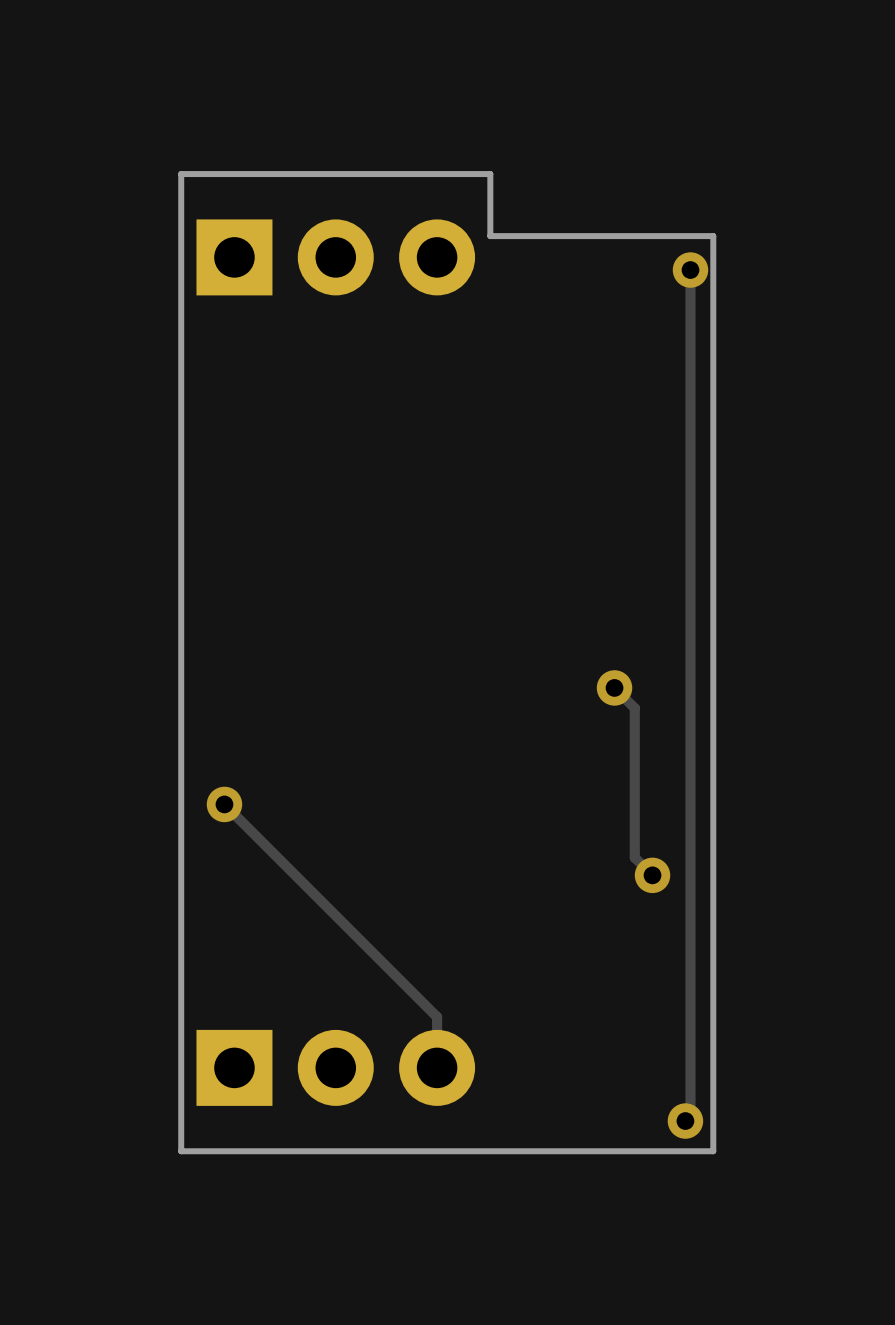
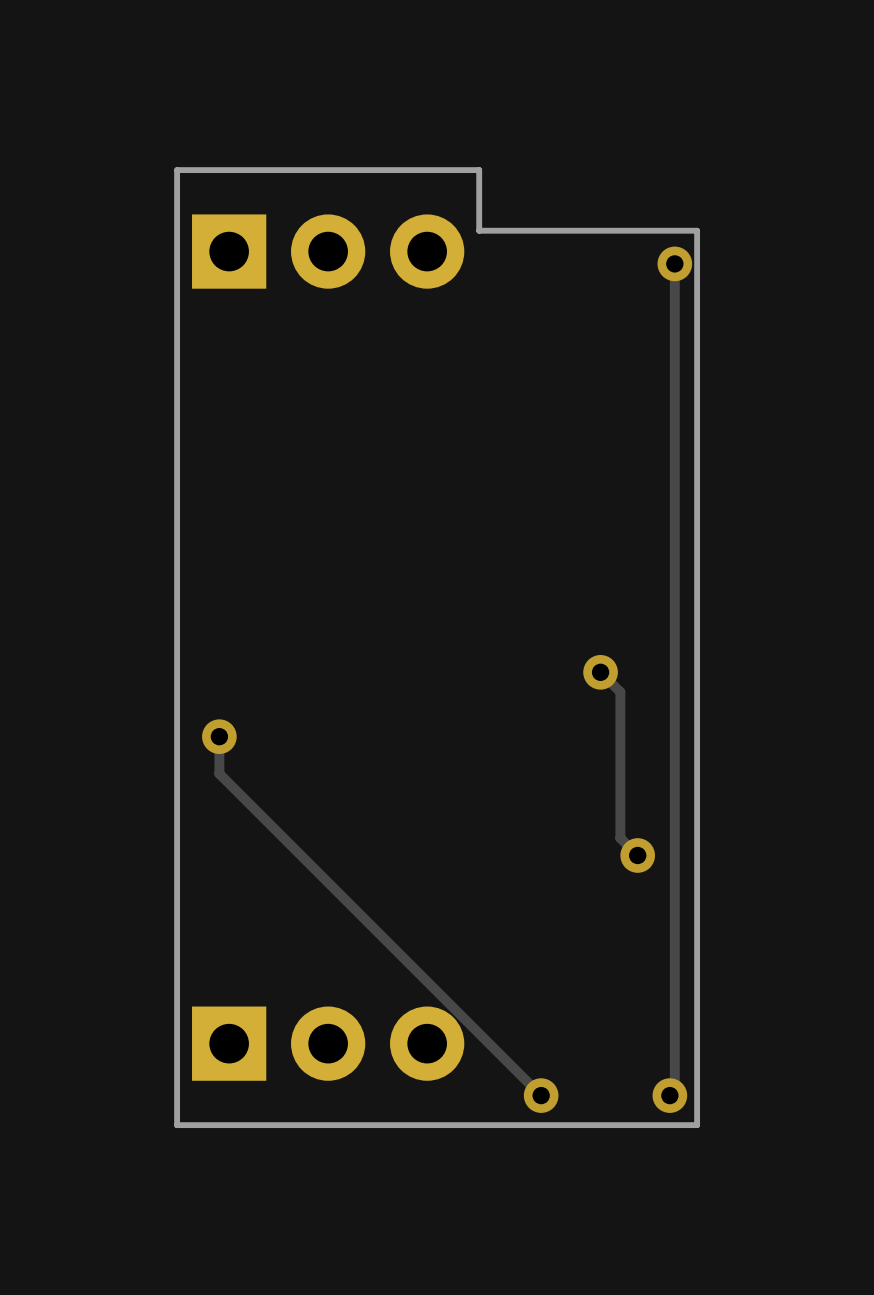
track: none -> (219, 736) (219, 773) (541, 1095)
track: (224, 804) (437, 1017) (437, 1067) -> none
via position: (224, 804) -> (219, 736)
via: none -> (541, 1095)

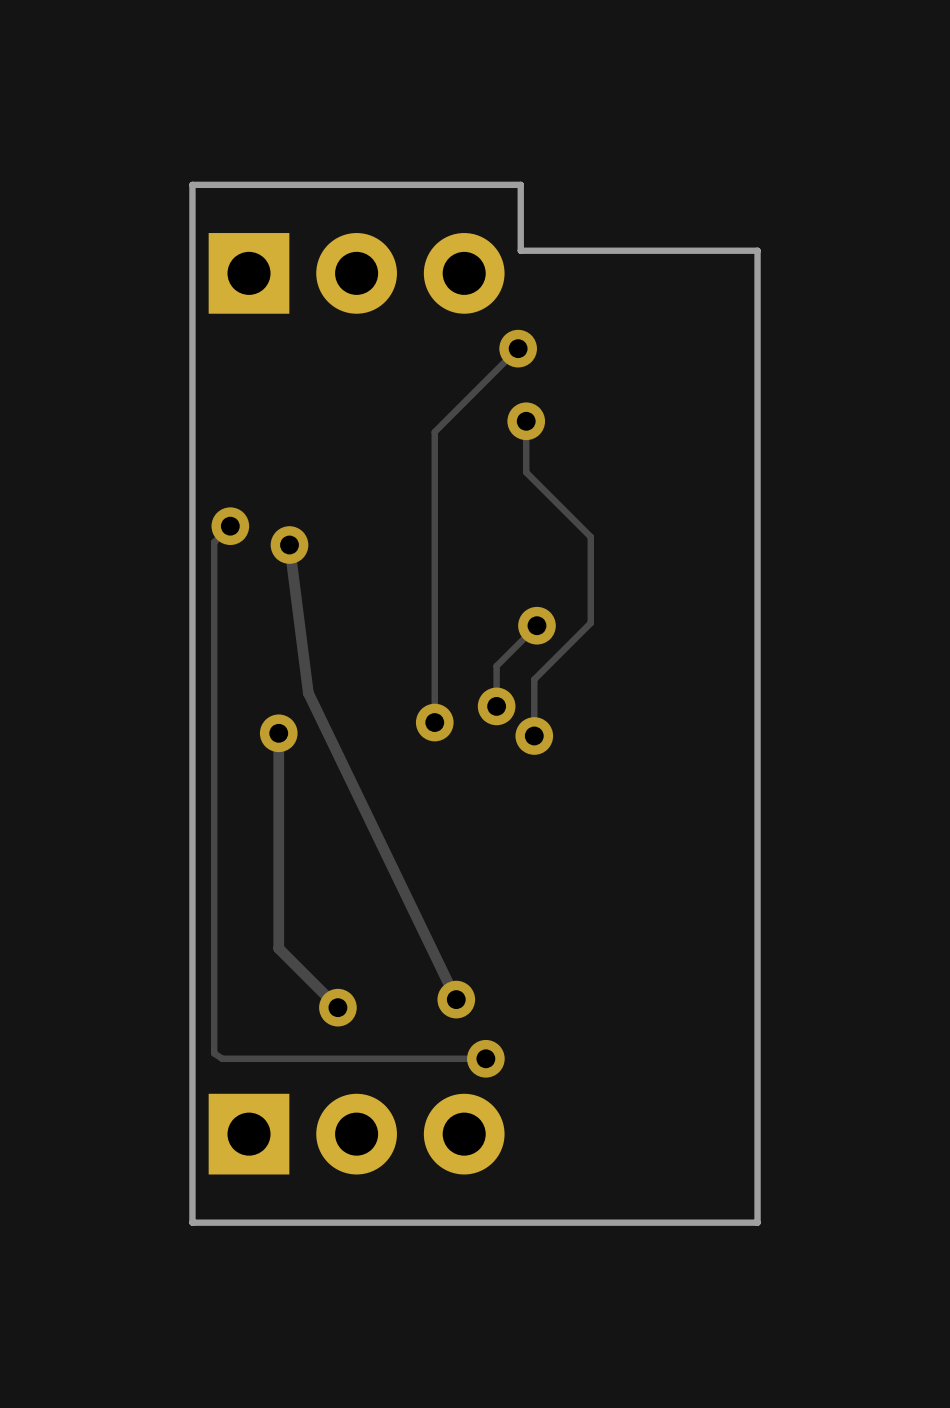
track: (674, 263) (674, 1090) (669, 1095) -> none
via: (674, 263) -> none
track: none -> (518, 348) (434, 432) (434, 722)
via: none -> (518, 348)
track: none -> (526, 421) (526, 472) (590, 536) (590, 623) (534, 679) (534, 735)
via: none -> (526, 421)
track: none -> (230, 526) (214, 542) (214, 1053) (222, 1058) (485, 1058)
via: none -> (230, 526)
track: none -> (289, 545) (308, 692) (456, 999)
via: none -> (289, 545)
track: none -> (536, 625) (496, 666) (496, 706)
via: none -> (536, 625)
via: none -> (496, 706)
via: none -> (434, 722)
track: (600, 672) (620, 692) (620, 838) (637, 855) -> none
via: (600, 672) -> none
track: none -> (278, 733) (278, 948) (337, 1007)
via: none -> (534, 735)
track: (219, 736) (219, 773) (541, 1095) -> none
via position: (219, 736) -> (278, 733)
via: (637, 855) -> none
via: none -> (456, 999)
via: none -> (337, 1007)
via: none -> (485, 1058)
via: (541, 1095) -> none
via: (669, 1095) -> none

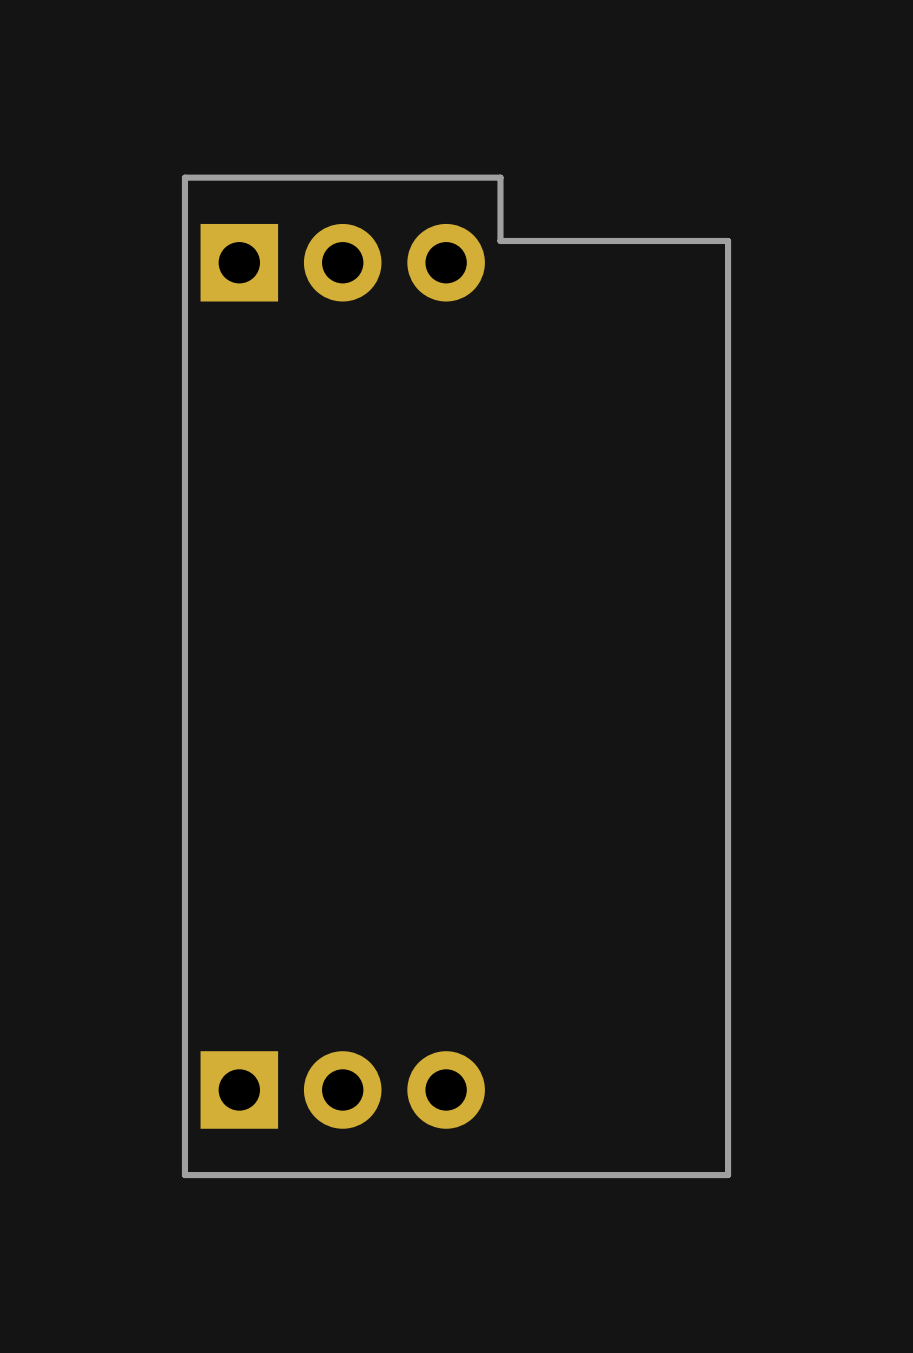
track: (518, 348) (434, 432) (434, 722) -> none
via: (518, 348) -> none
track: (526, 421) (526, 472) (590, 536) (590, 623) (534, 679) (534, 735) -> none
via: (526, 421) -> none
track: (230, 526) (214, 542) (214, 1053) (222, 1058) (485, 1058) -> none
via: (230, 526) -> none
track: (289, 545) (308, 692) (456, 999) -> none
via: (289, 545) -> none
track: (536, 625) (496, 666) (496, 706) -> none
via: (536, 625) -> none
via: (496, 706) -> none
via: (434, 722) -> none
track: (278, 733) (278, 948) (337, 1007) -> none
via: (278, 733) -> none
via: (534, 735) -> none
via: (456, 999) -> none
via: (337, 1007) -> none
via: (485, 1058) -> none

